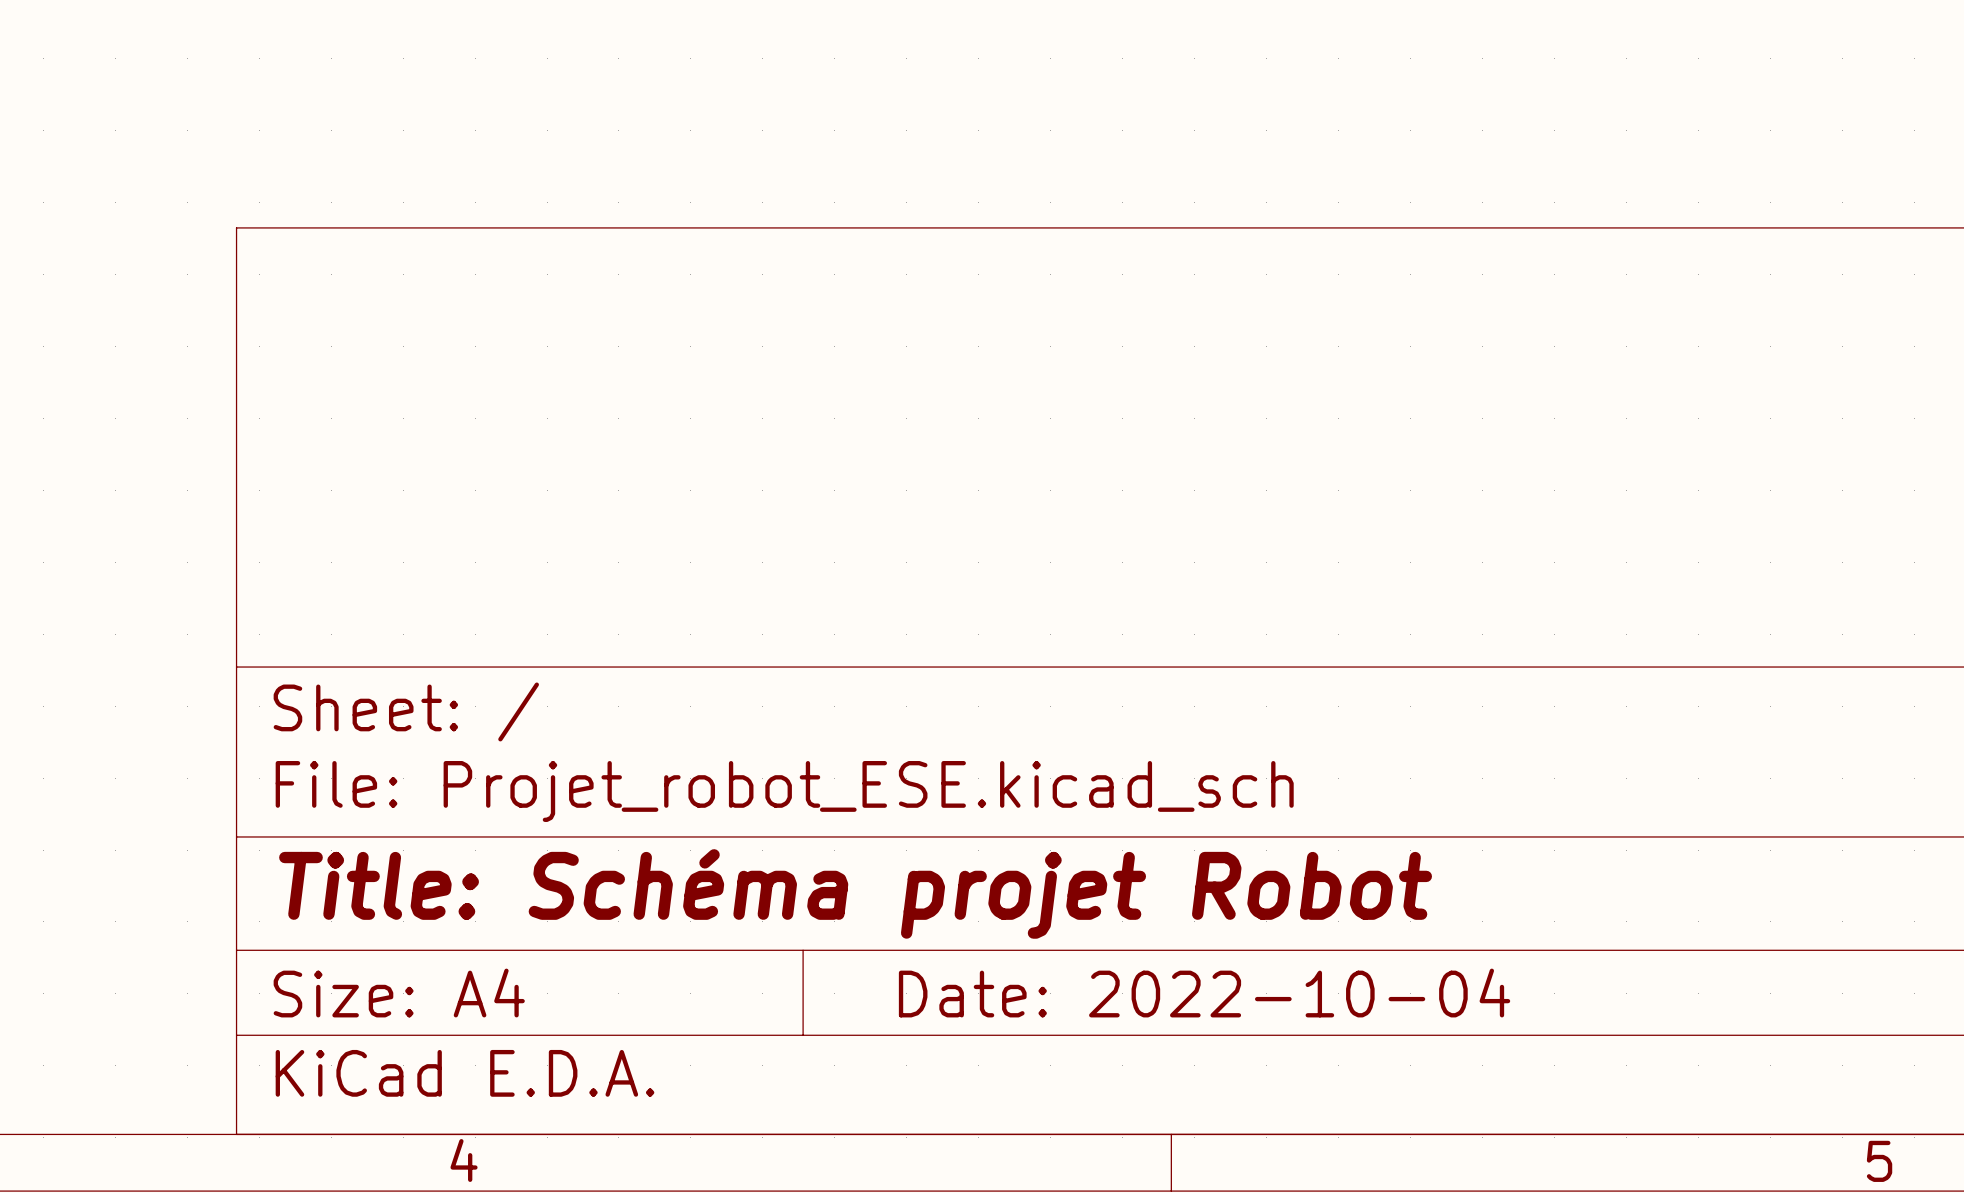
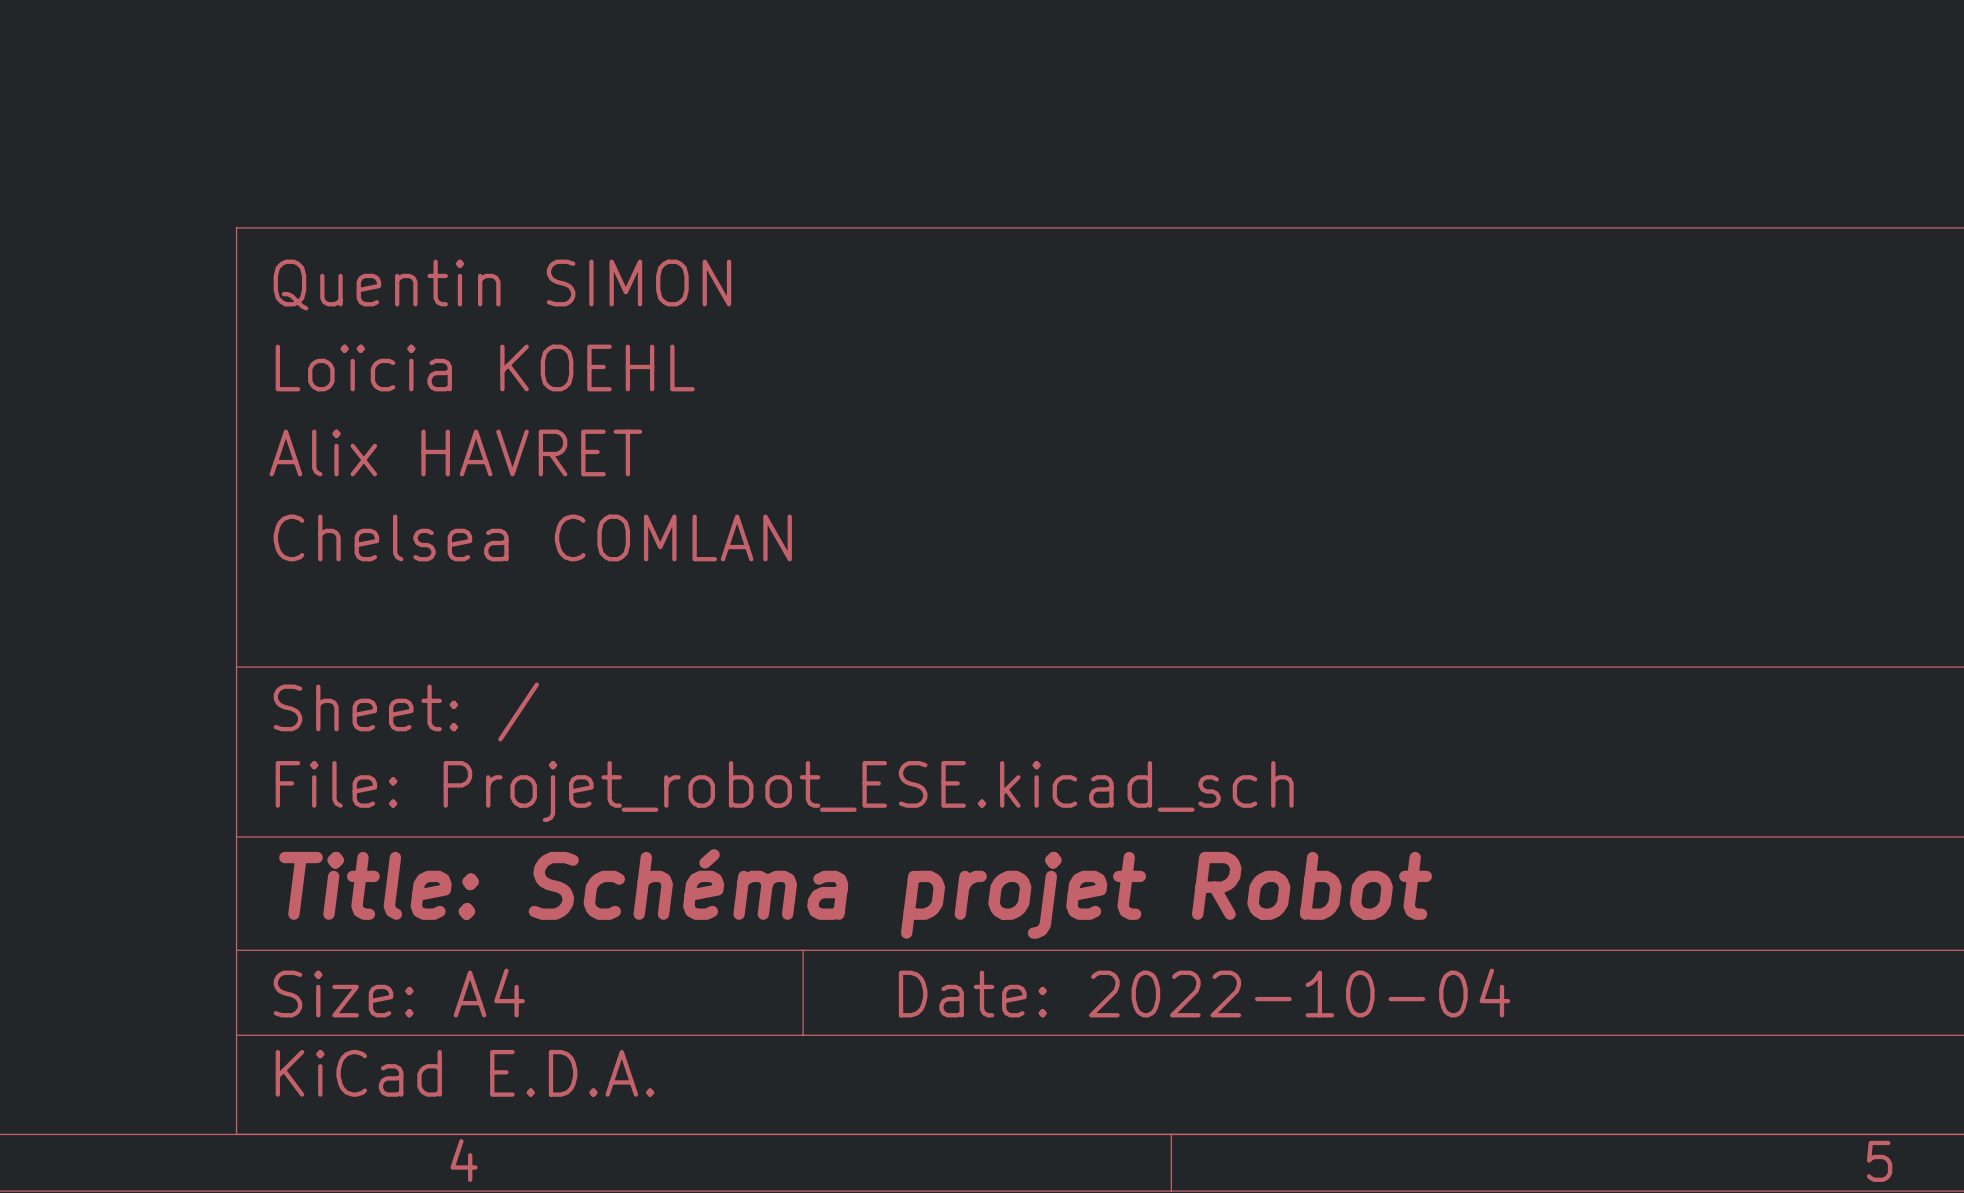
title block: none -> Quentin SIMON (502, 285)
title block: none -> Loïcia KOEHL (485, 367)
title block: none -> Alix HAVRET (455, 452)
title block: none -> Chelsea COMLAN (532, 537)

